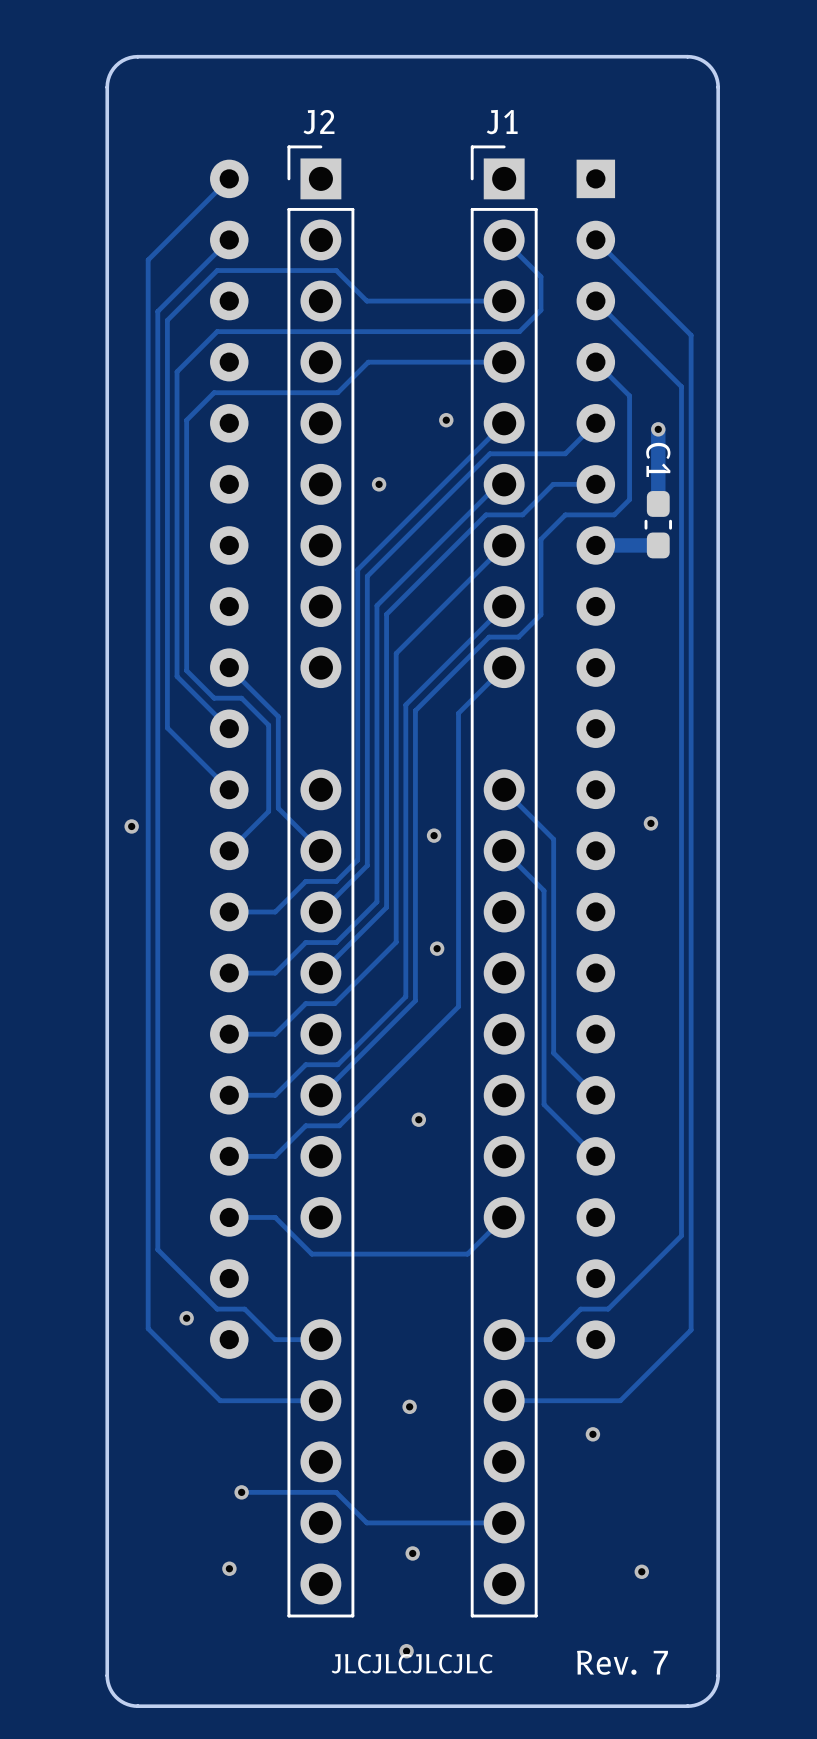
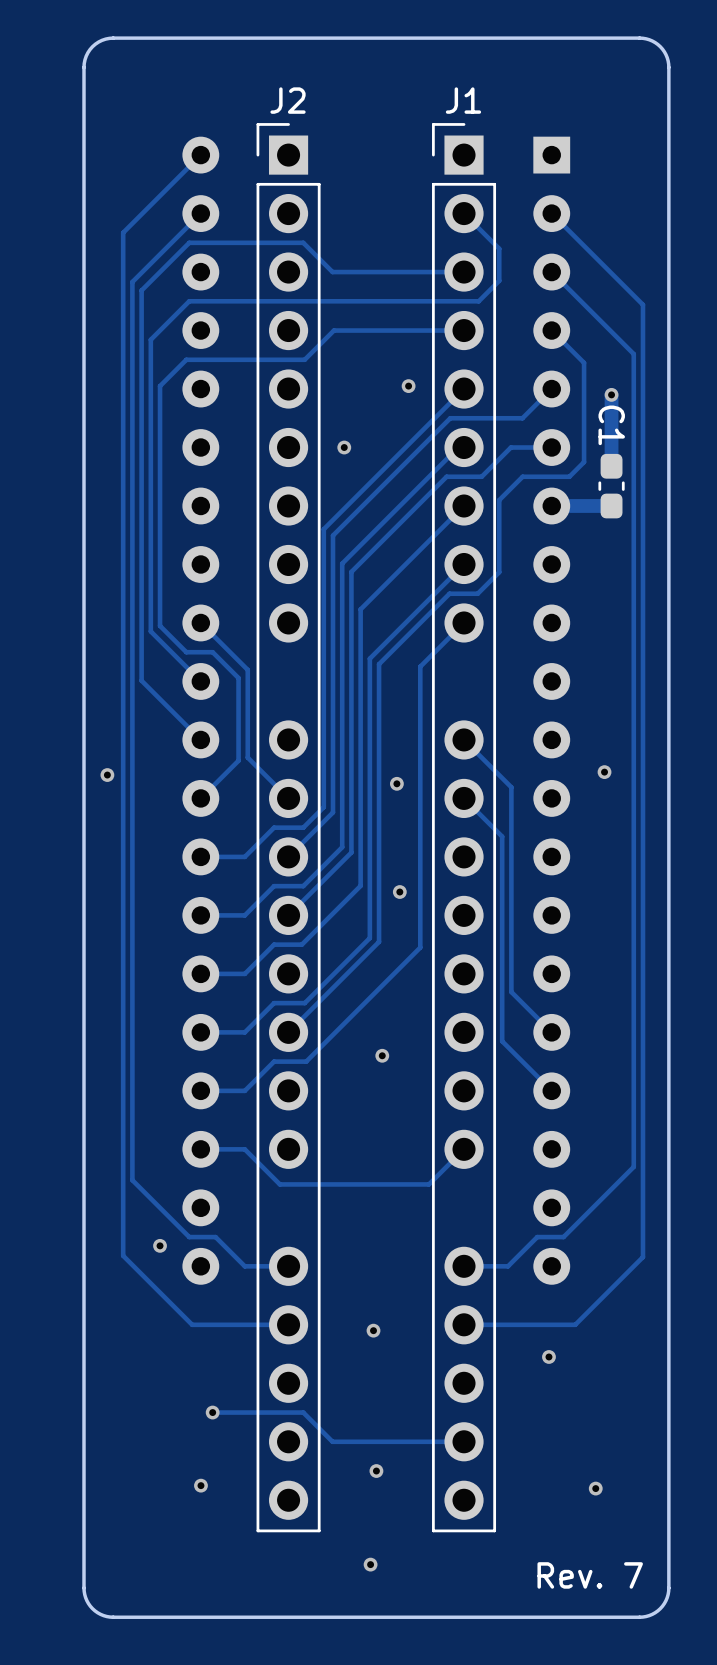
text: JLCJLCJLCJLC (412, 1663) -> none

